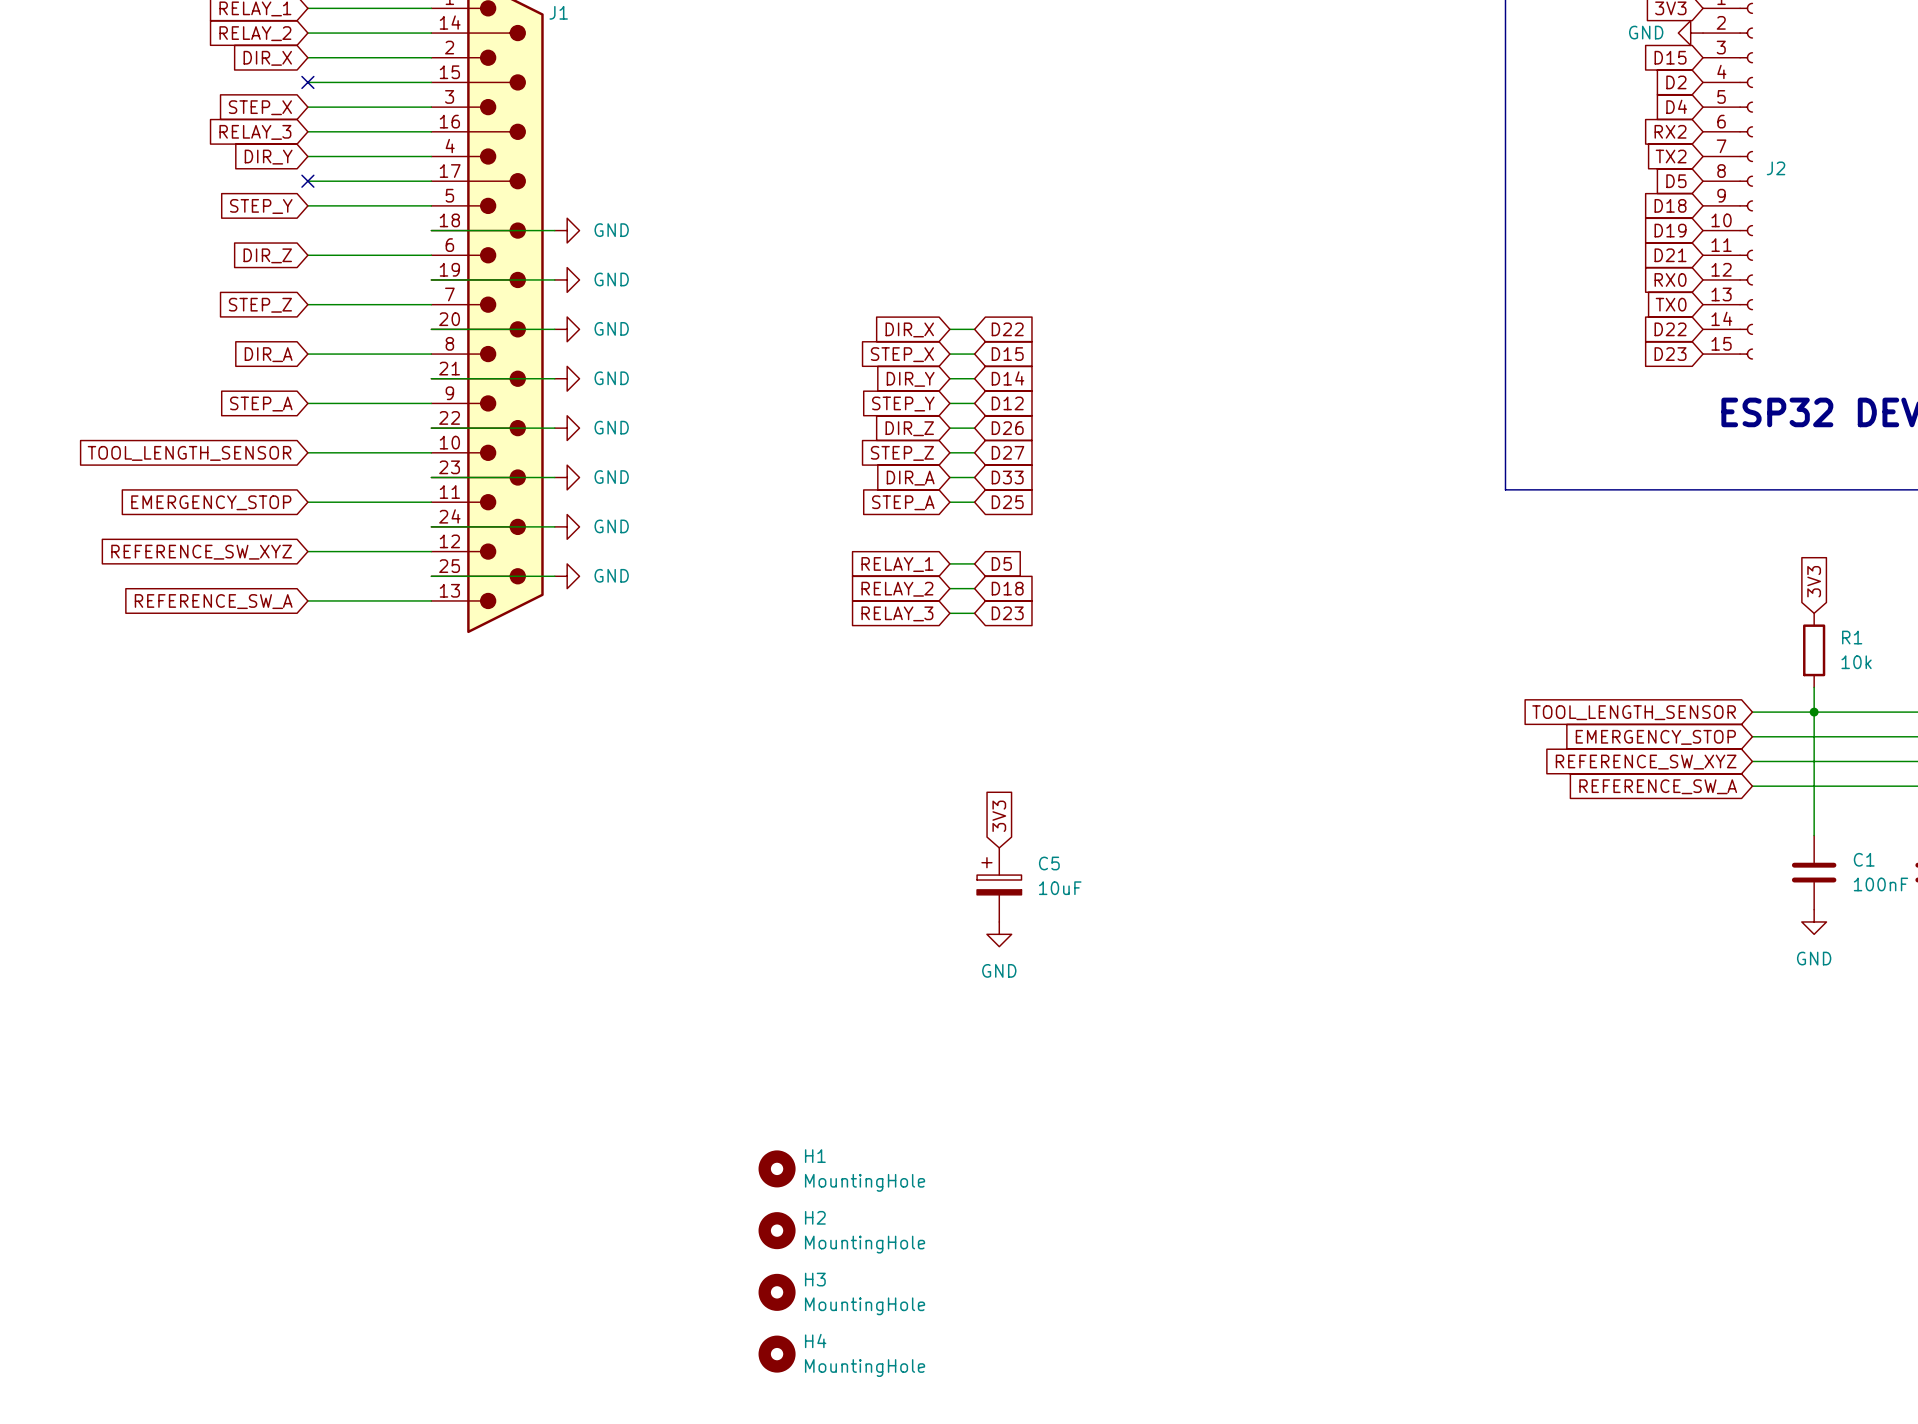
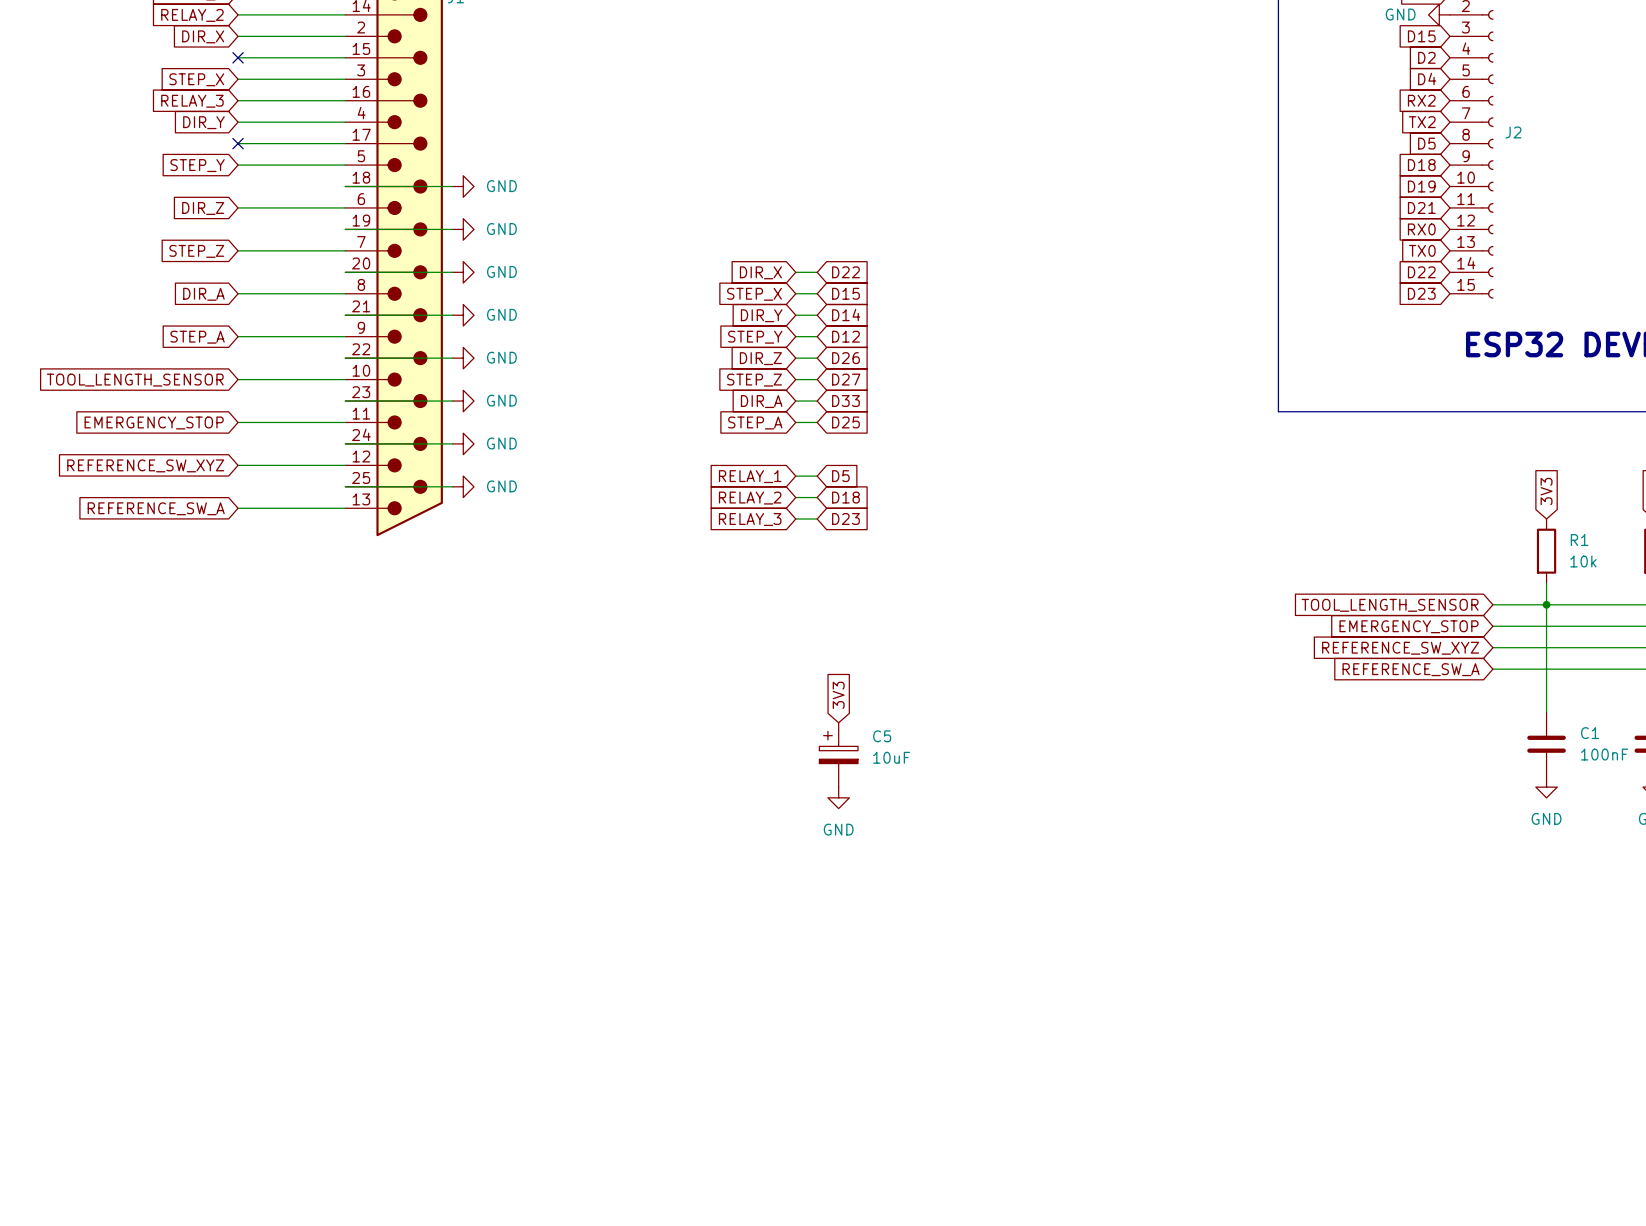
H1: MountingHole (777, 1168) -> none
H2: MountingHole (777, 1230) -> none
H3: MountingHole (777, 1292) -> none
H4: MountingHole (777, 1354) -> none

